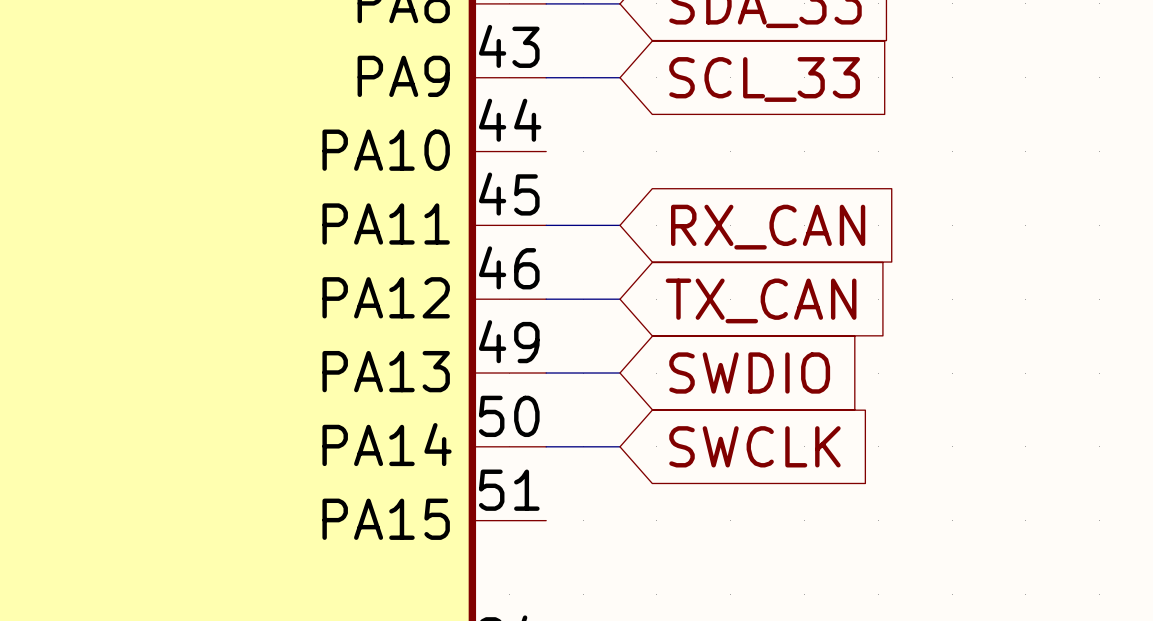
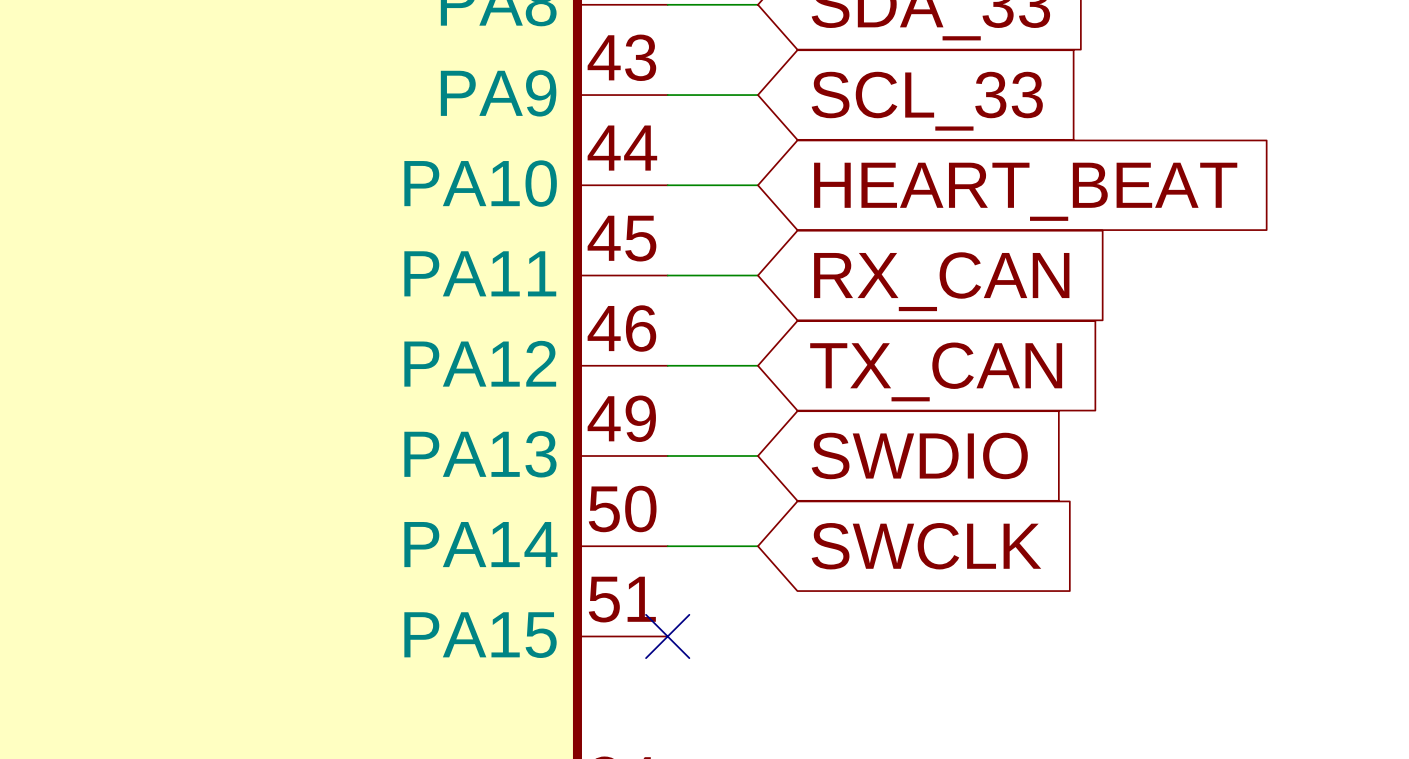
wire: none -> (667, 185) (757, 185)
global label: none -> HEART_BEAT (1025, 191)
no-connect mark: none -> (667, 636)

